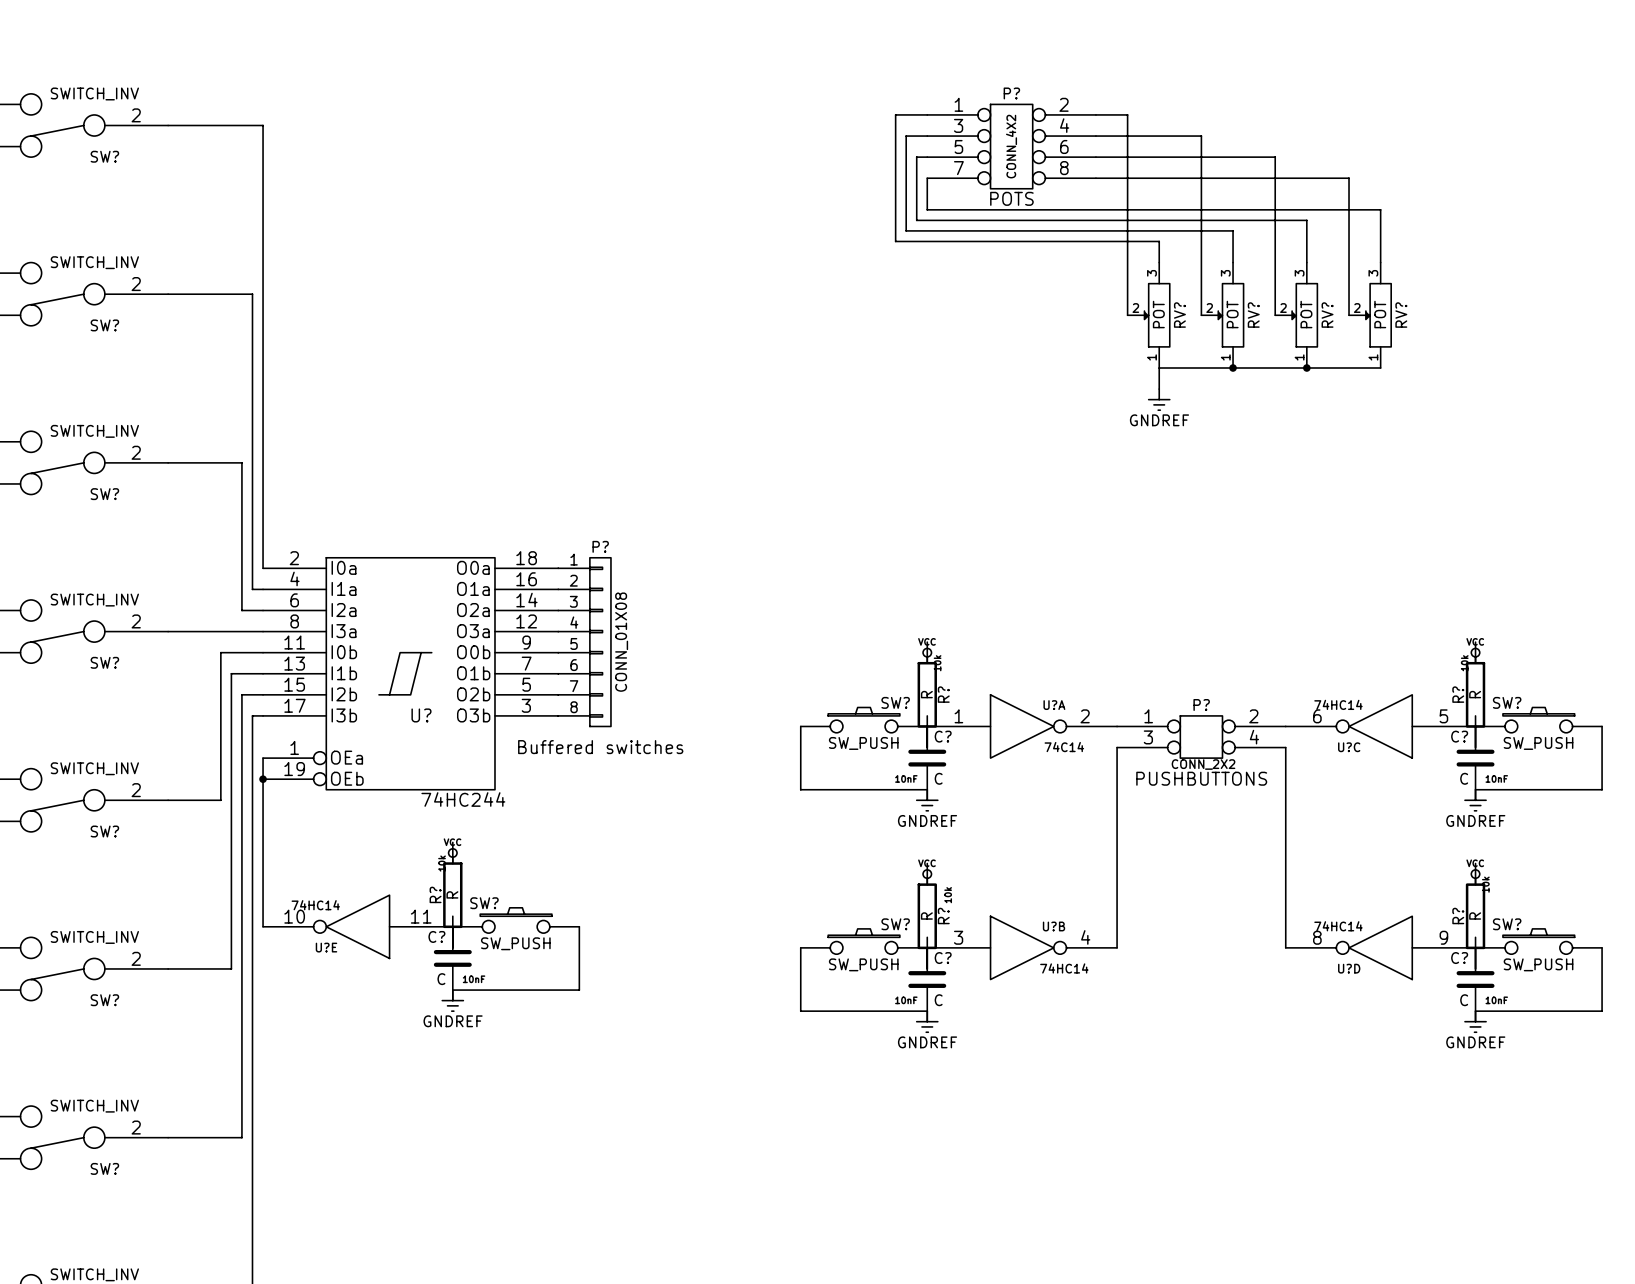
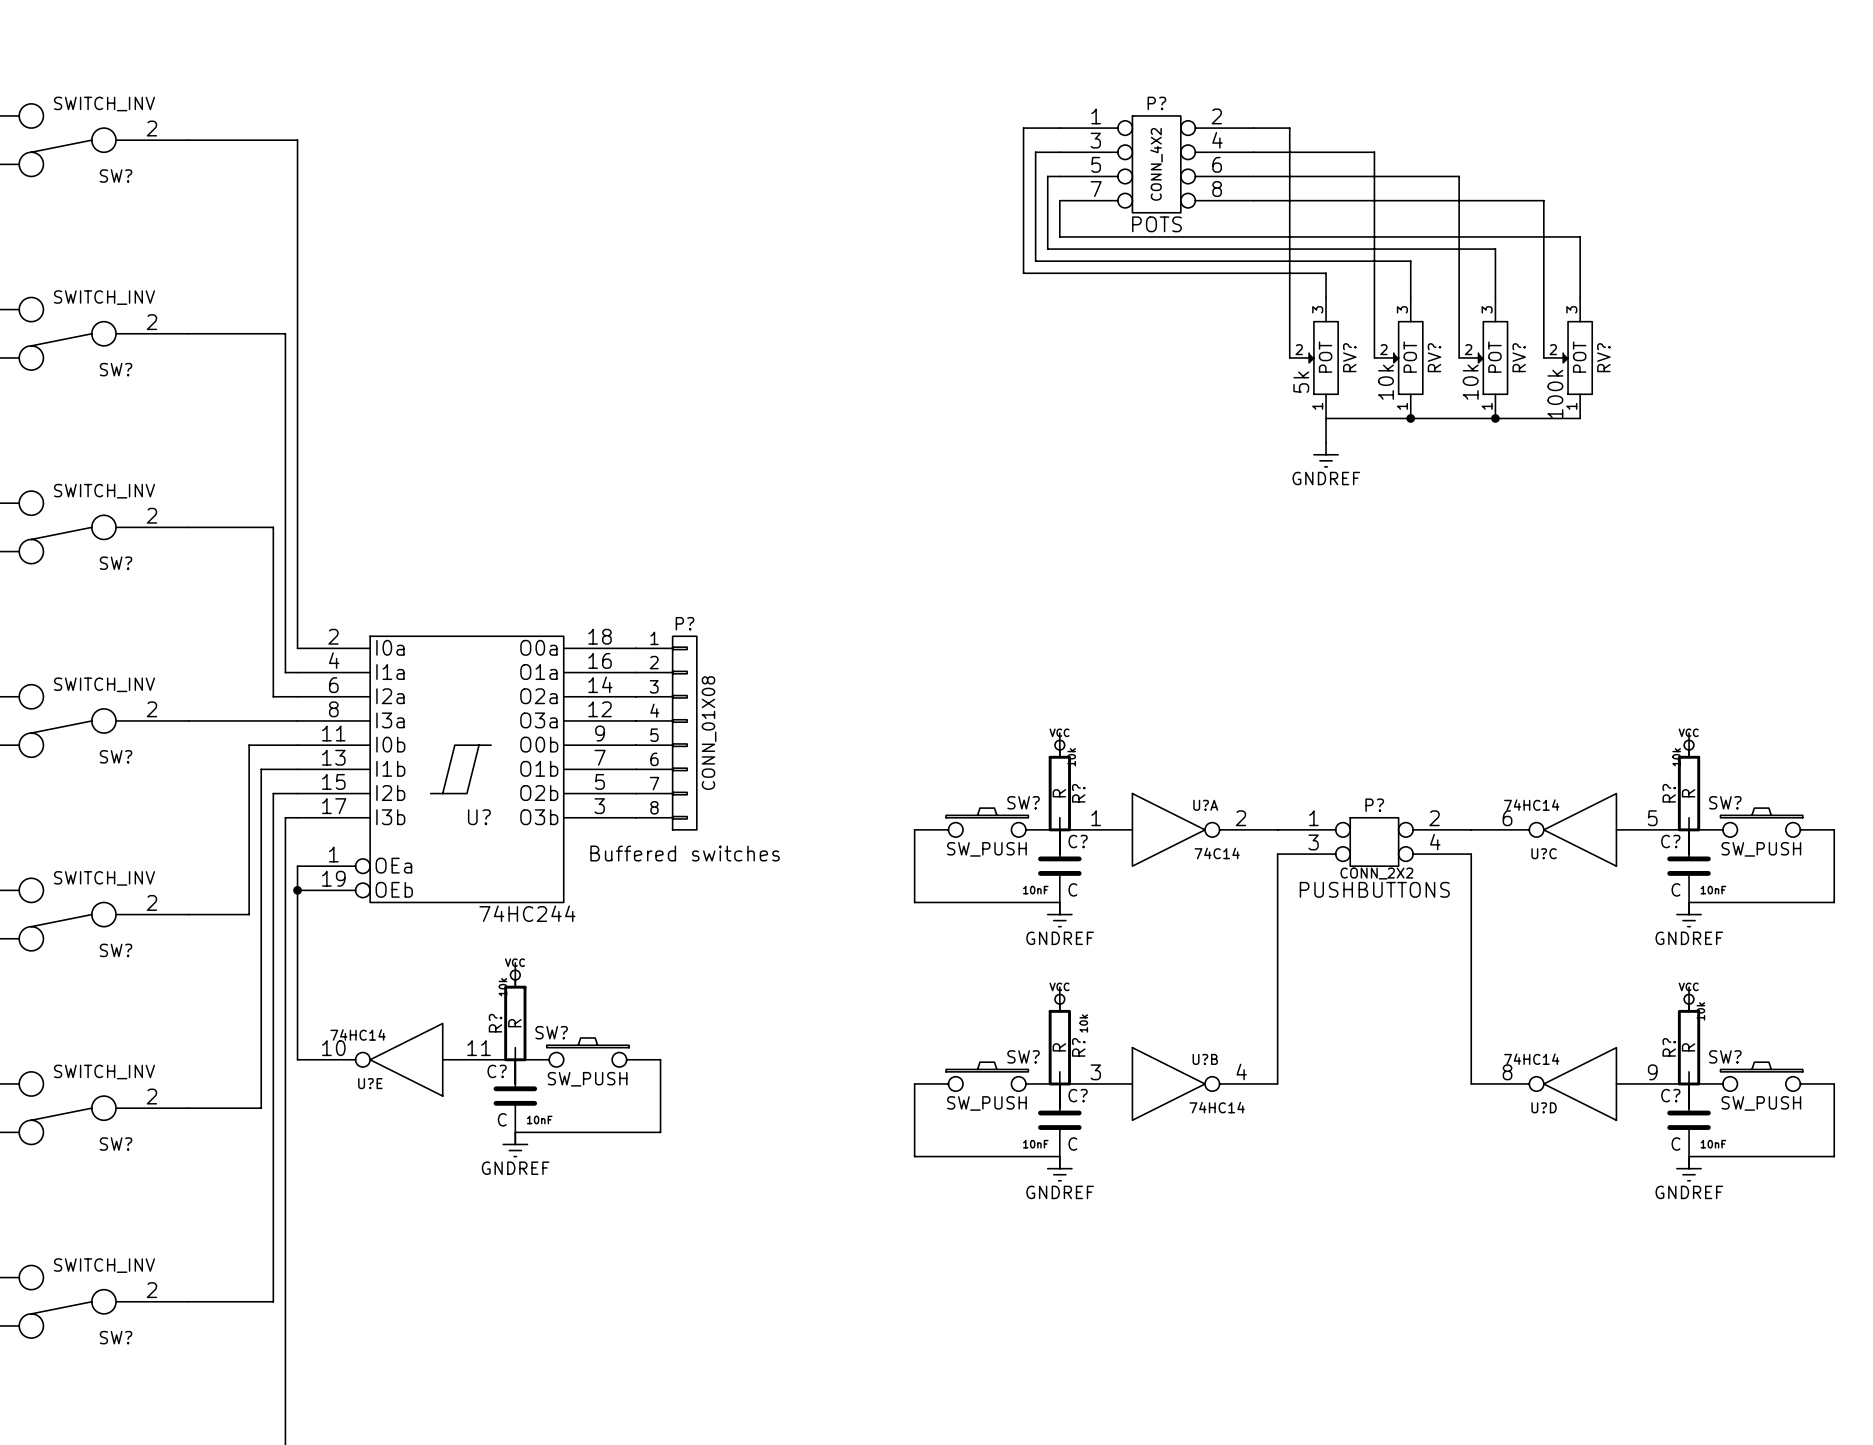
RV? text: none -> 5k (1301, 382)
RV? text: none -> 10k (1385, 382)
RV? text: none -> 10k (1470, 382)
RV? text: none -> 100k (1555, 394)

